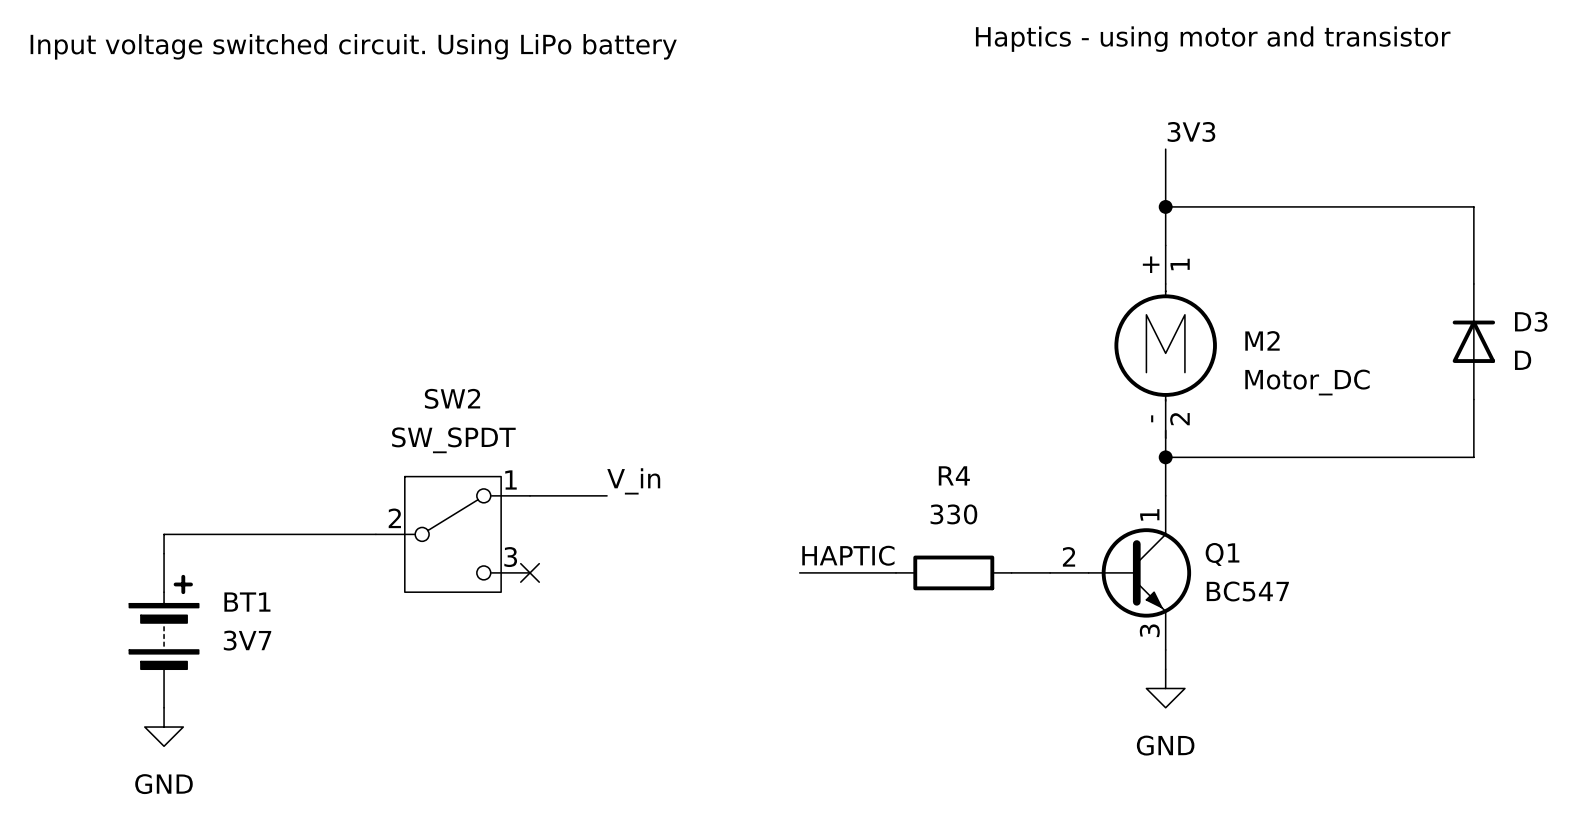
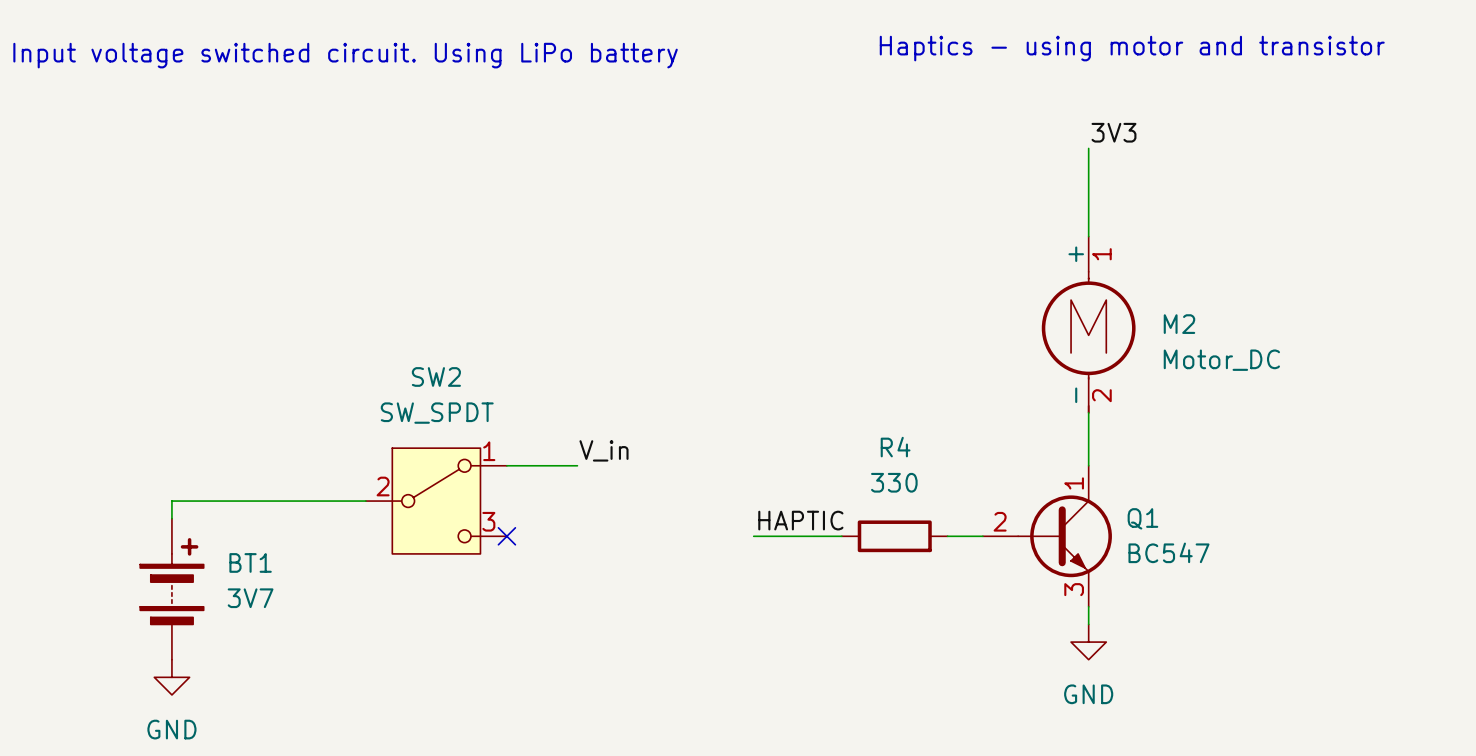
wire: (1165, 206) (1473, 206) (1473, 283) -> none
junction: (1165, 206) -> none
D3: D (1473, 341) -> none
wire: (1473, 399) (1473, 457) (1165, 457) -> none
junction: (1165, 457) -> none

